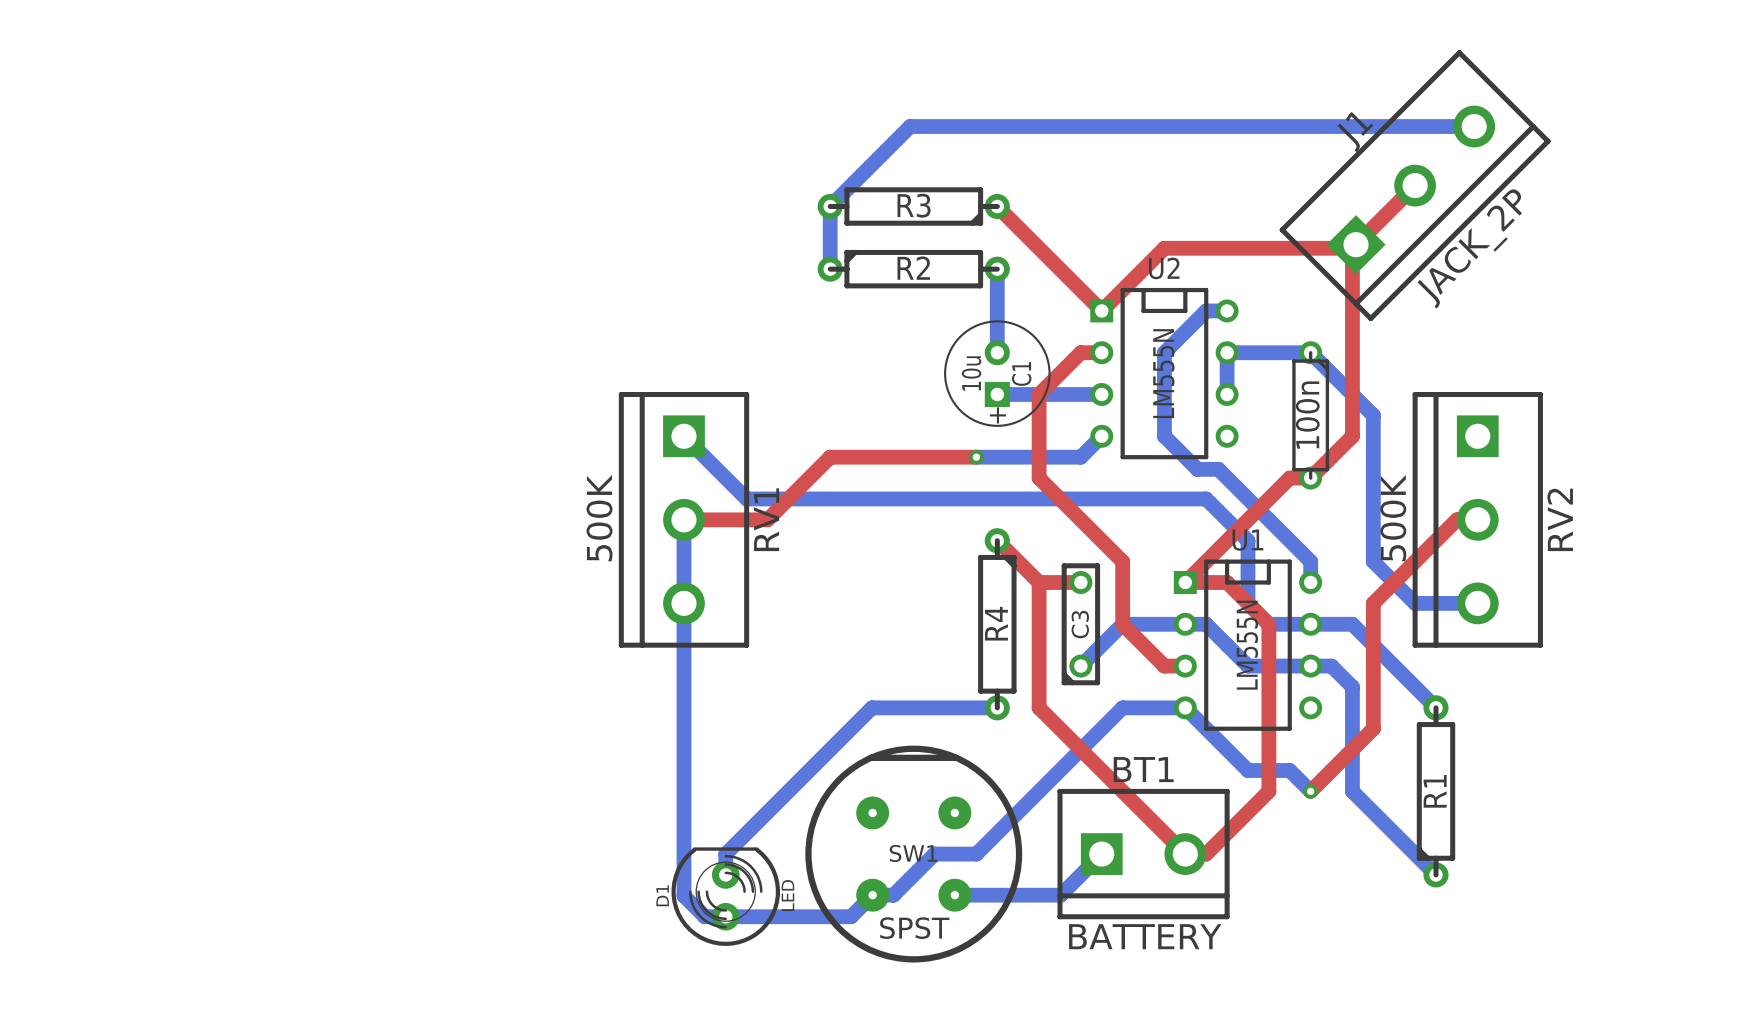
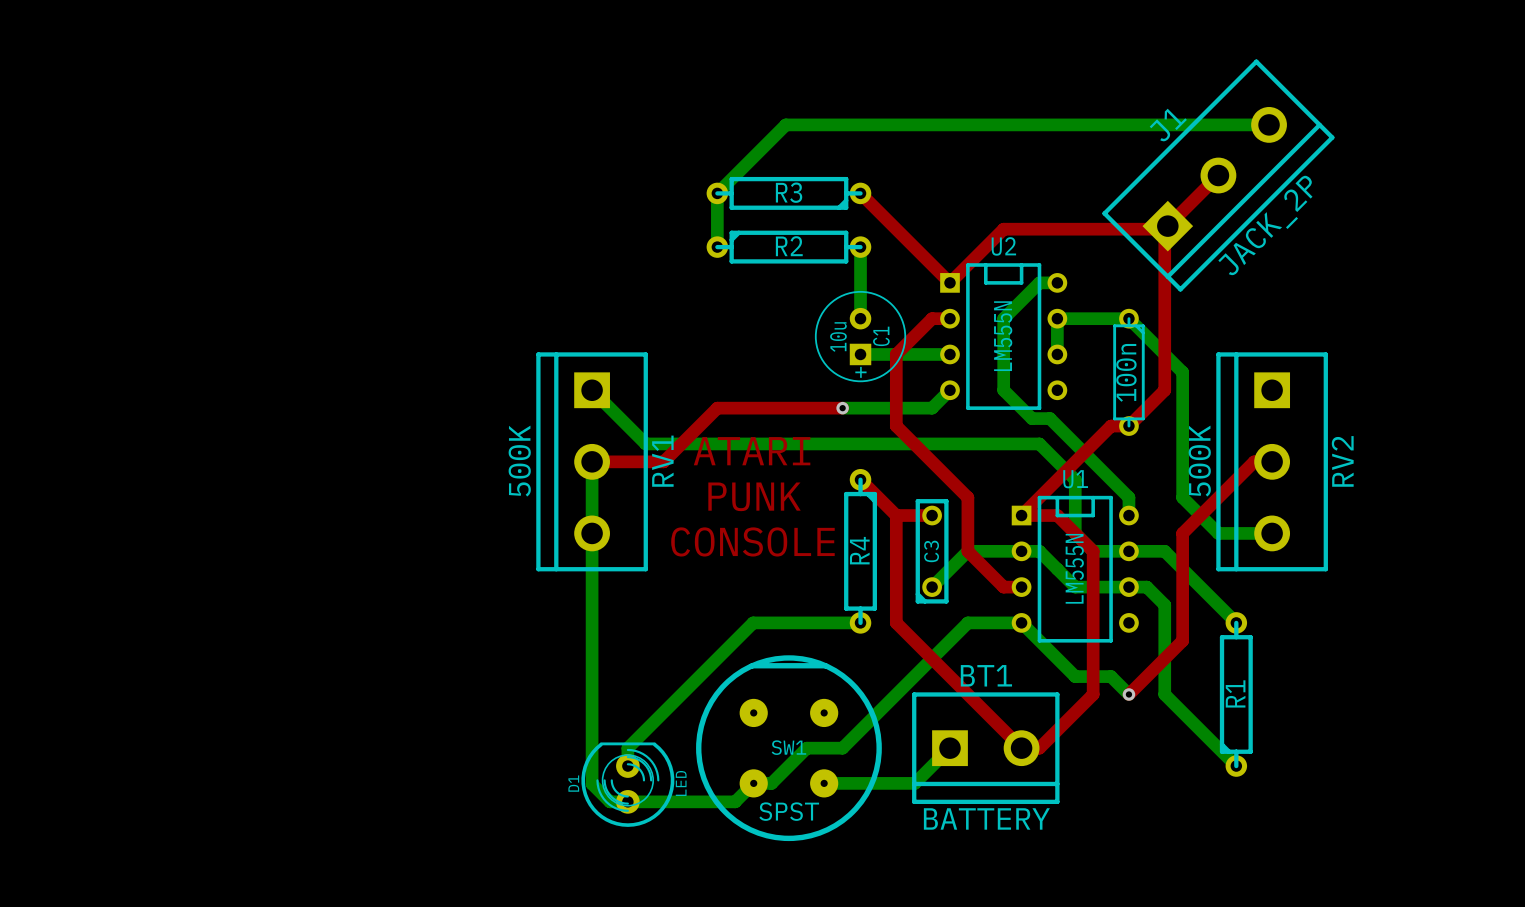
text: none -> ATARI (752, 451)
text: none -> PUNK (754, 496)
text: none -> CONSOLE (752, 541)

